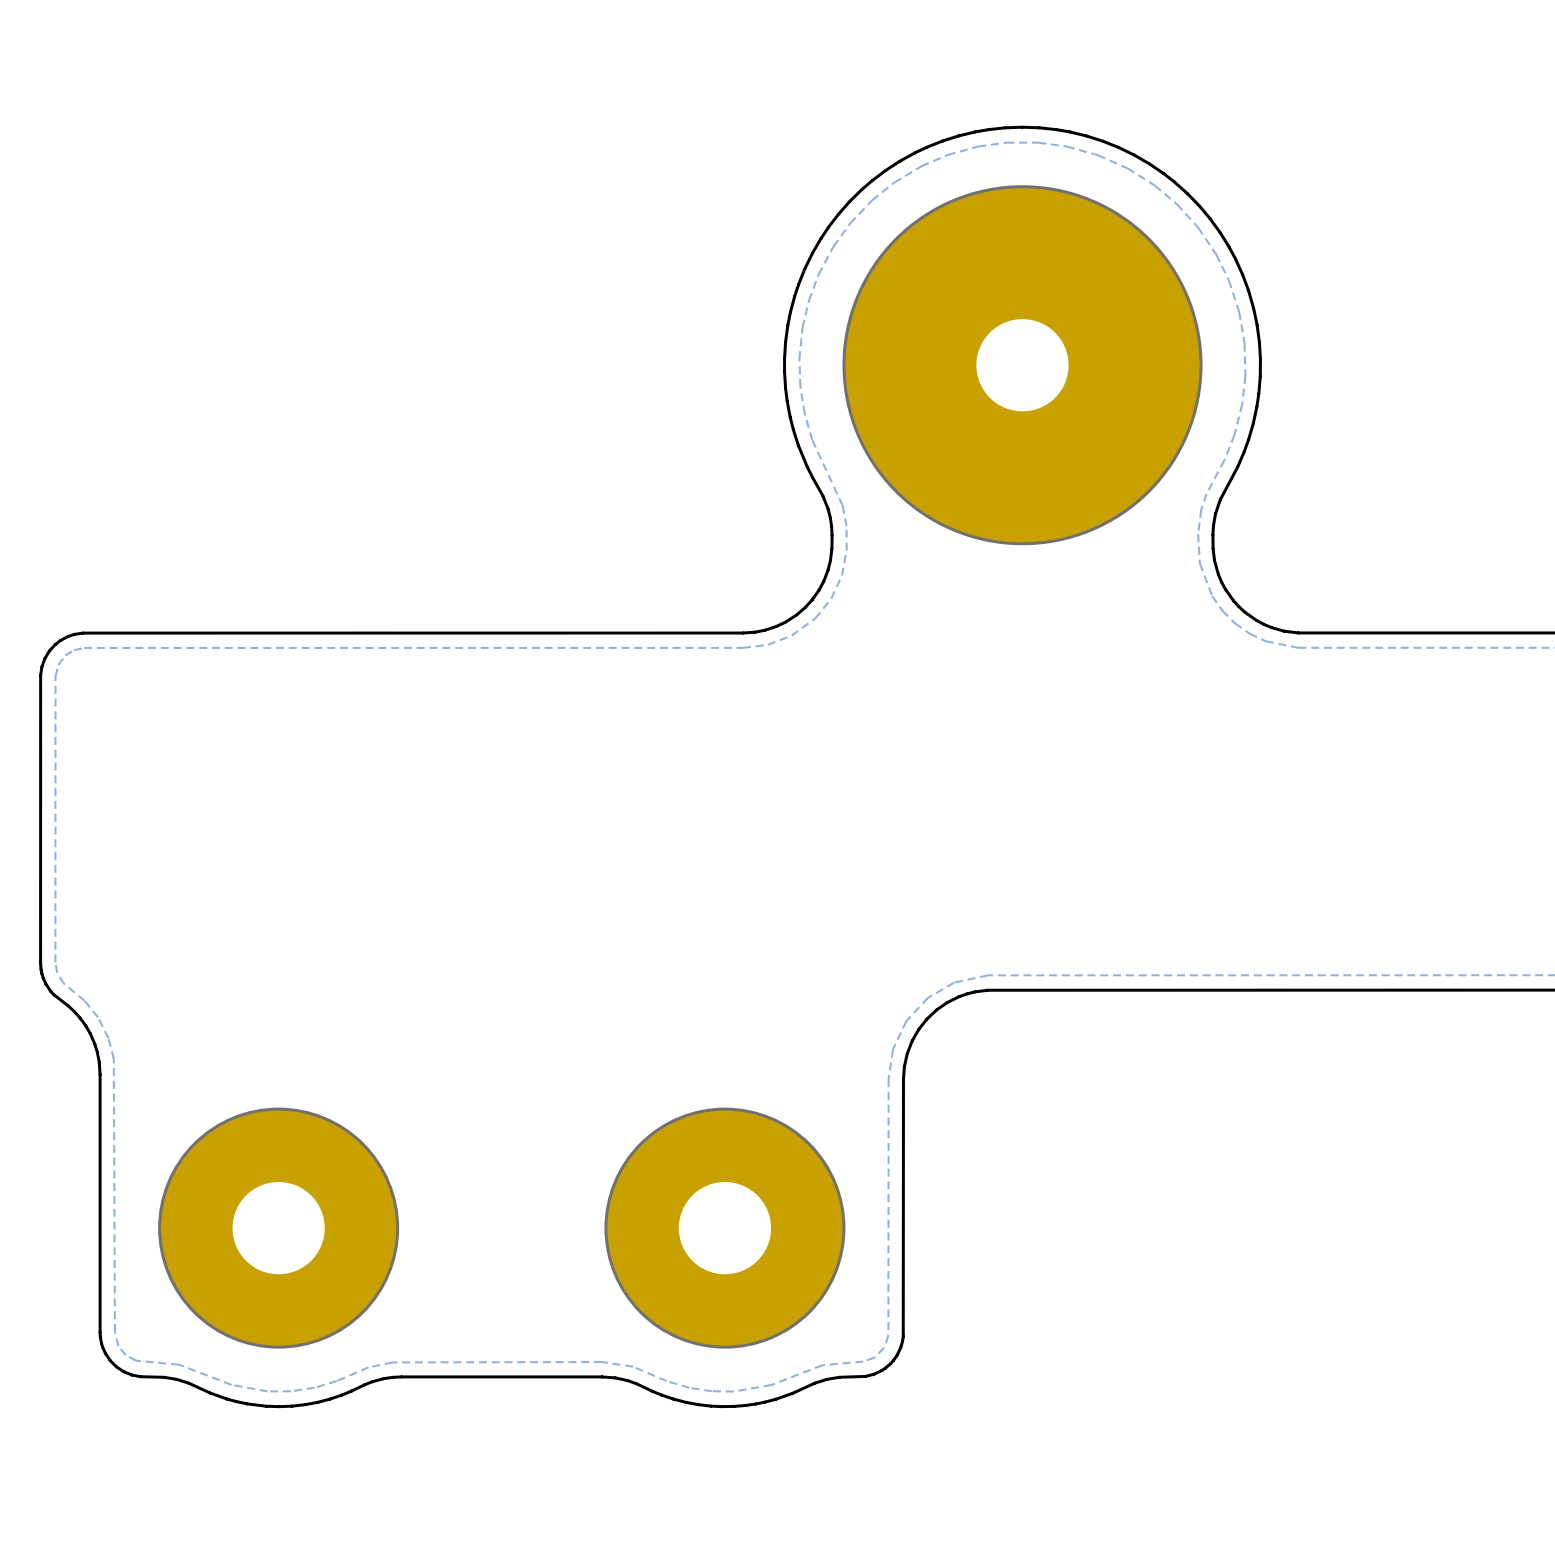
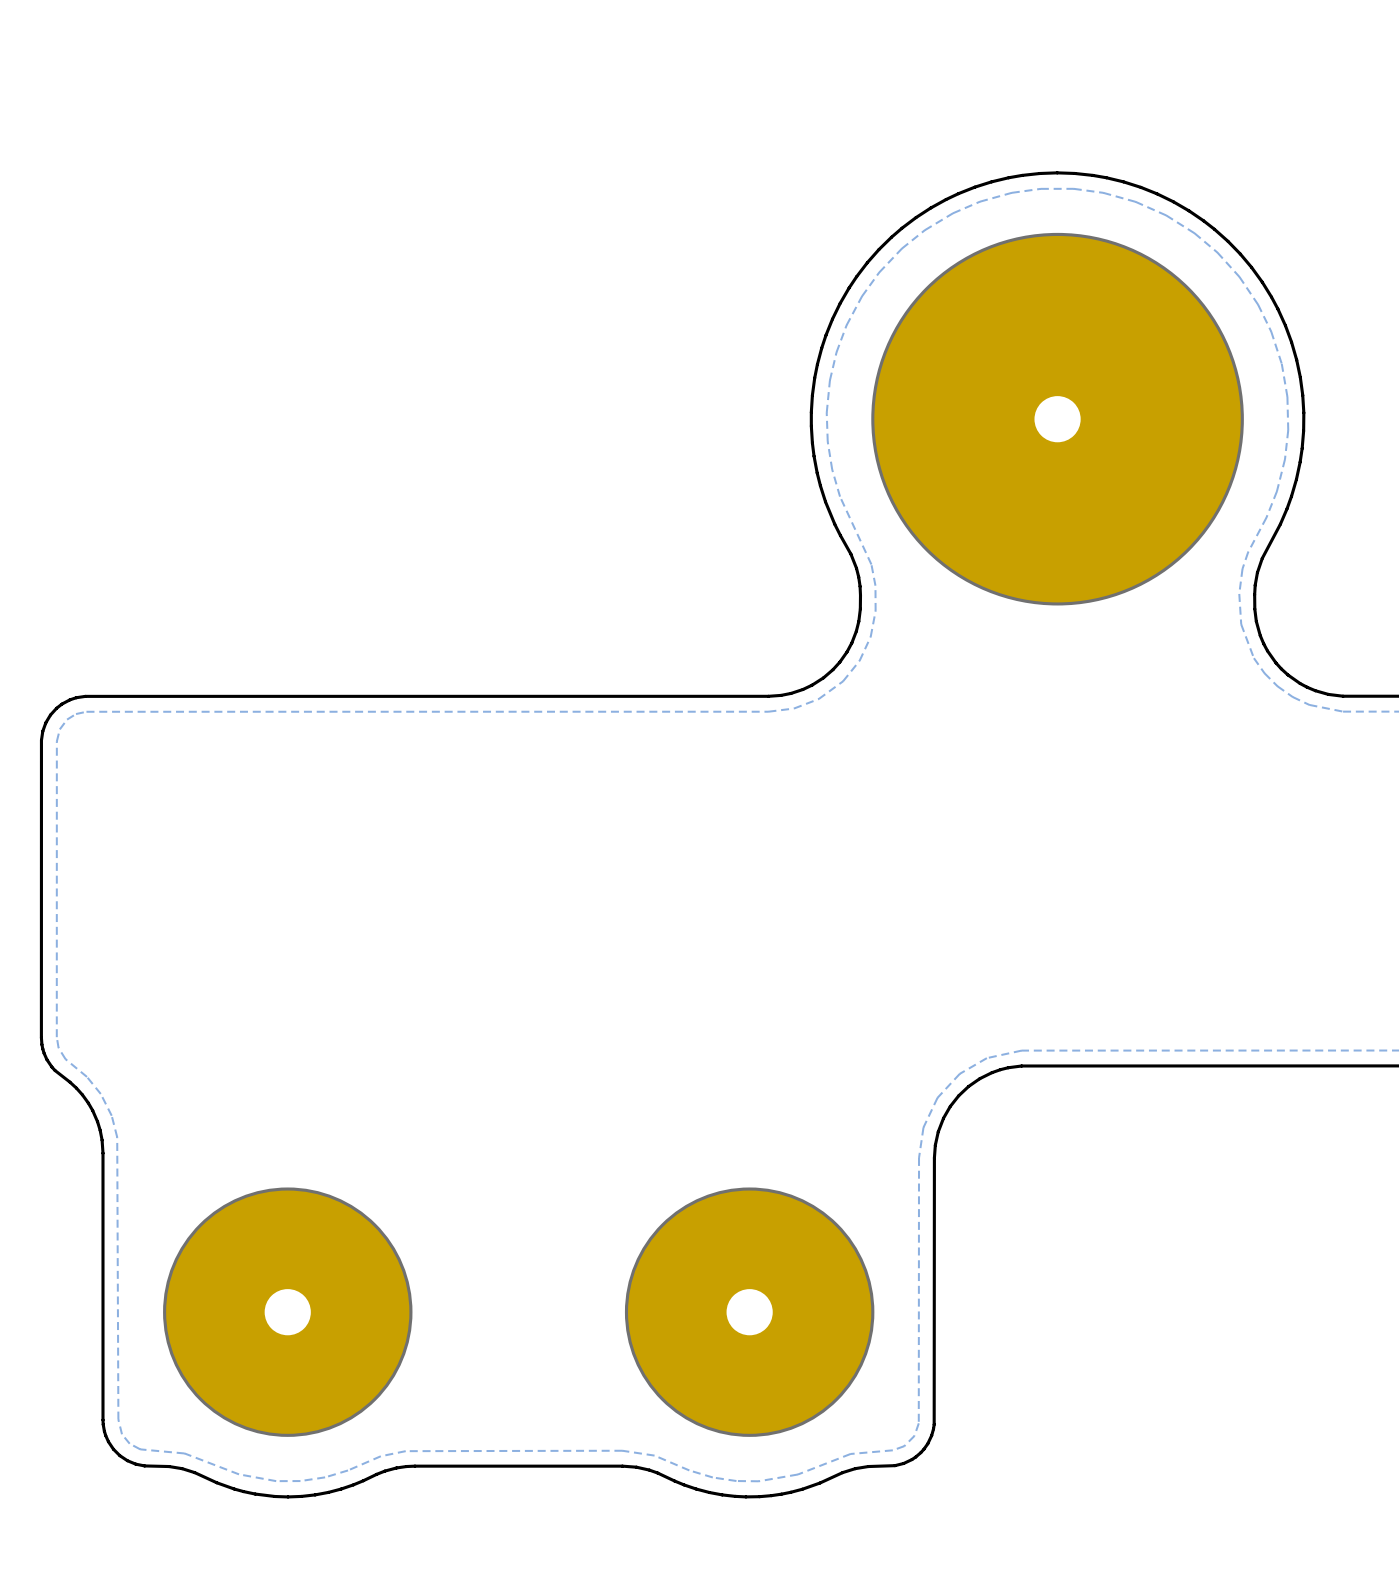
part footprint: [842, 185, 1203, 546] -> [871, 232, 1244, 606]
part footprint: [158, 1107, 400, 1349] -> [163, 1187, 413, 1437]
part footprint: [604, 1107, 846, 1349] -> [624, 1187, 875, 1437]

